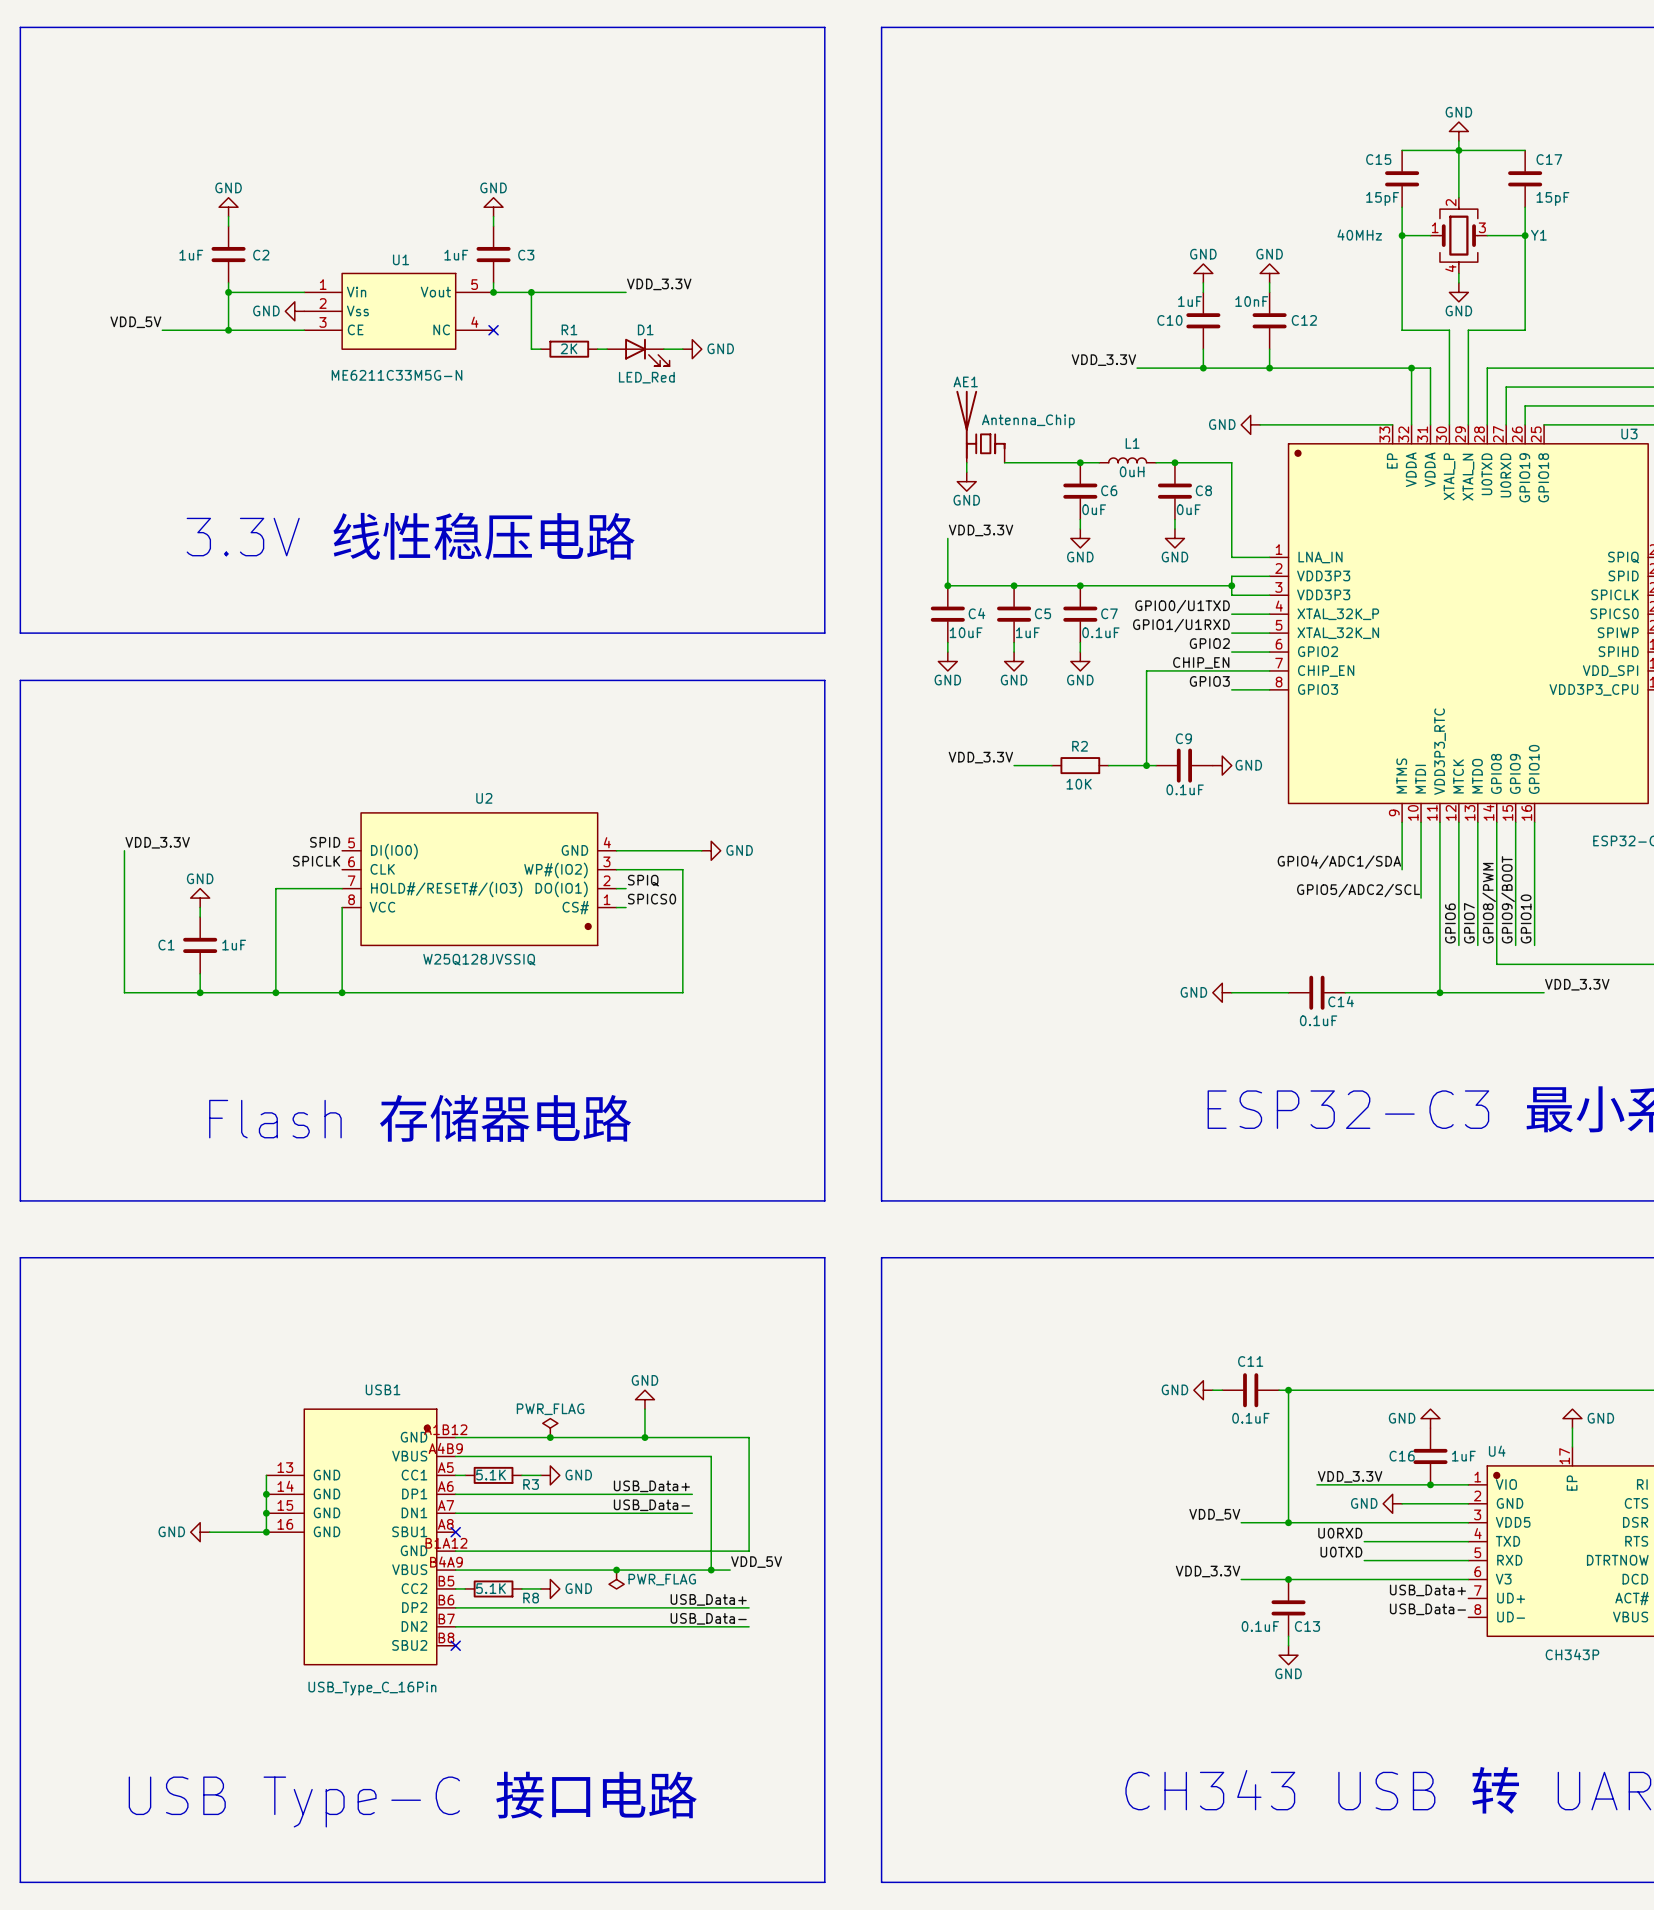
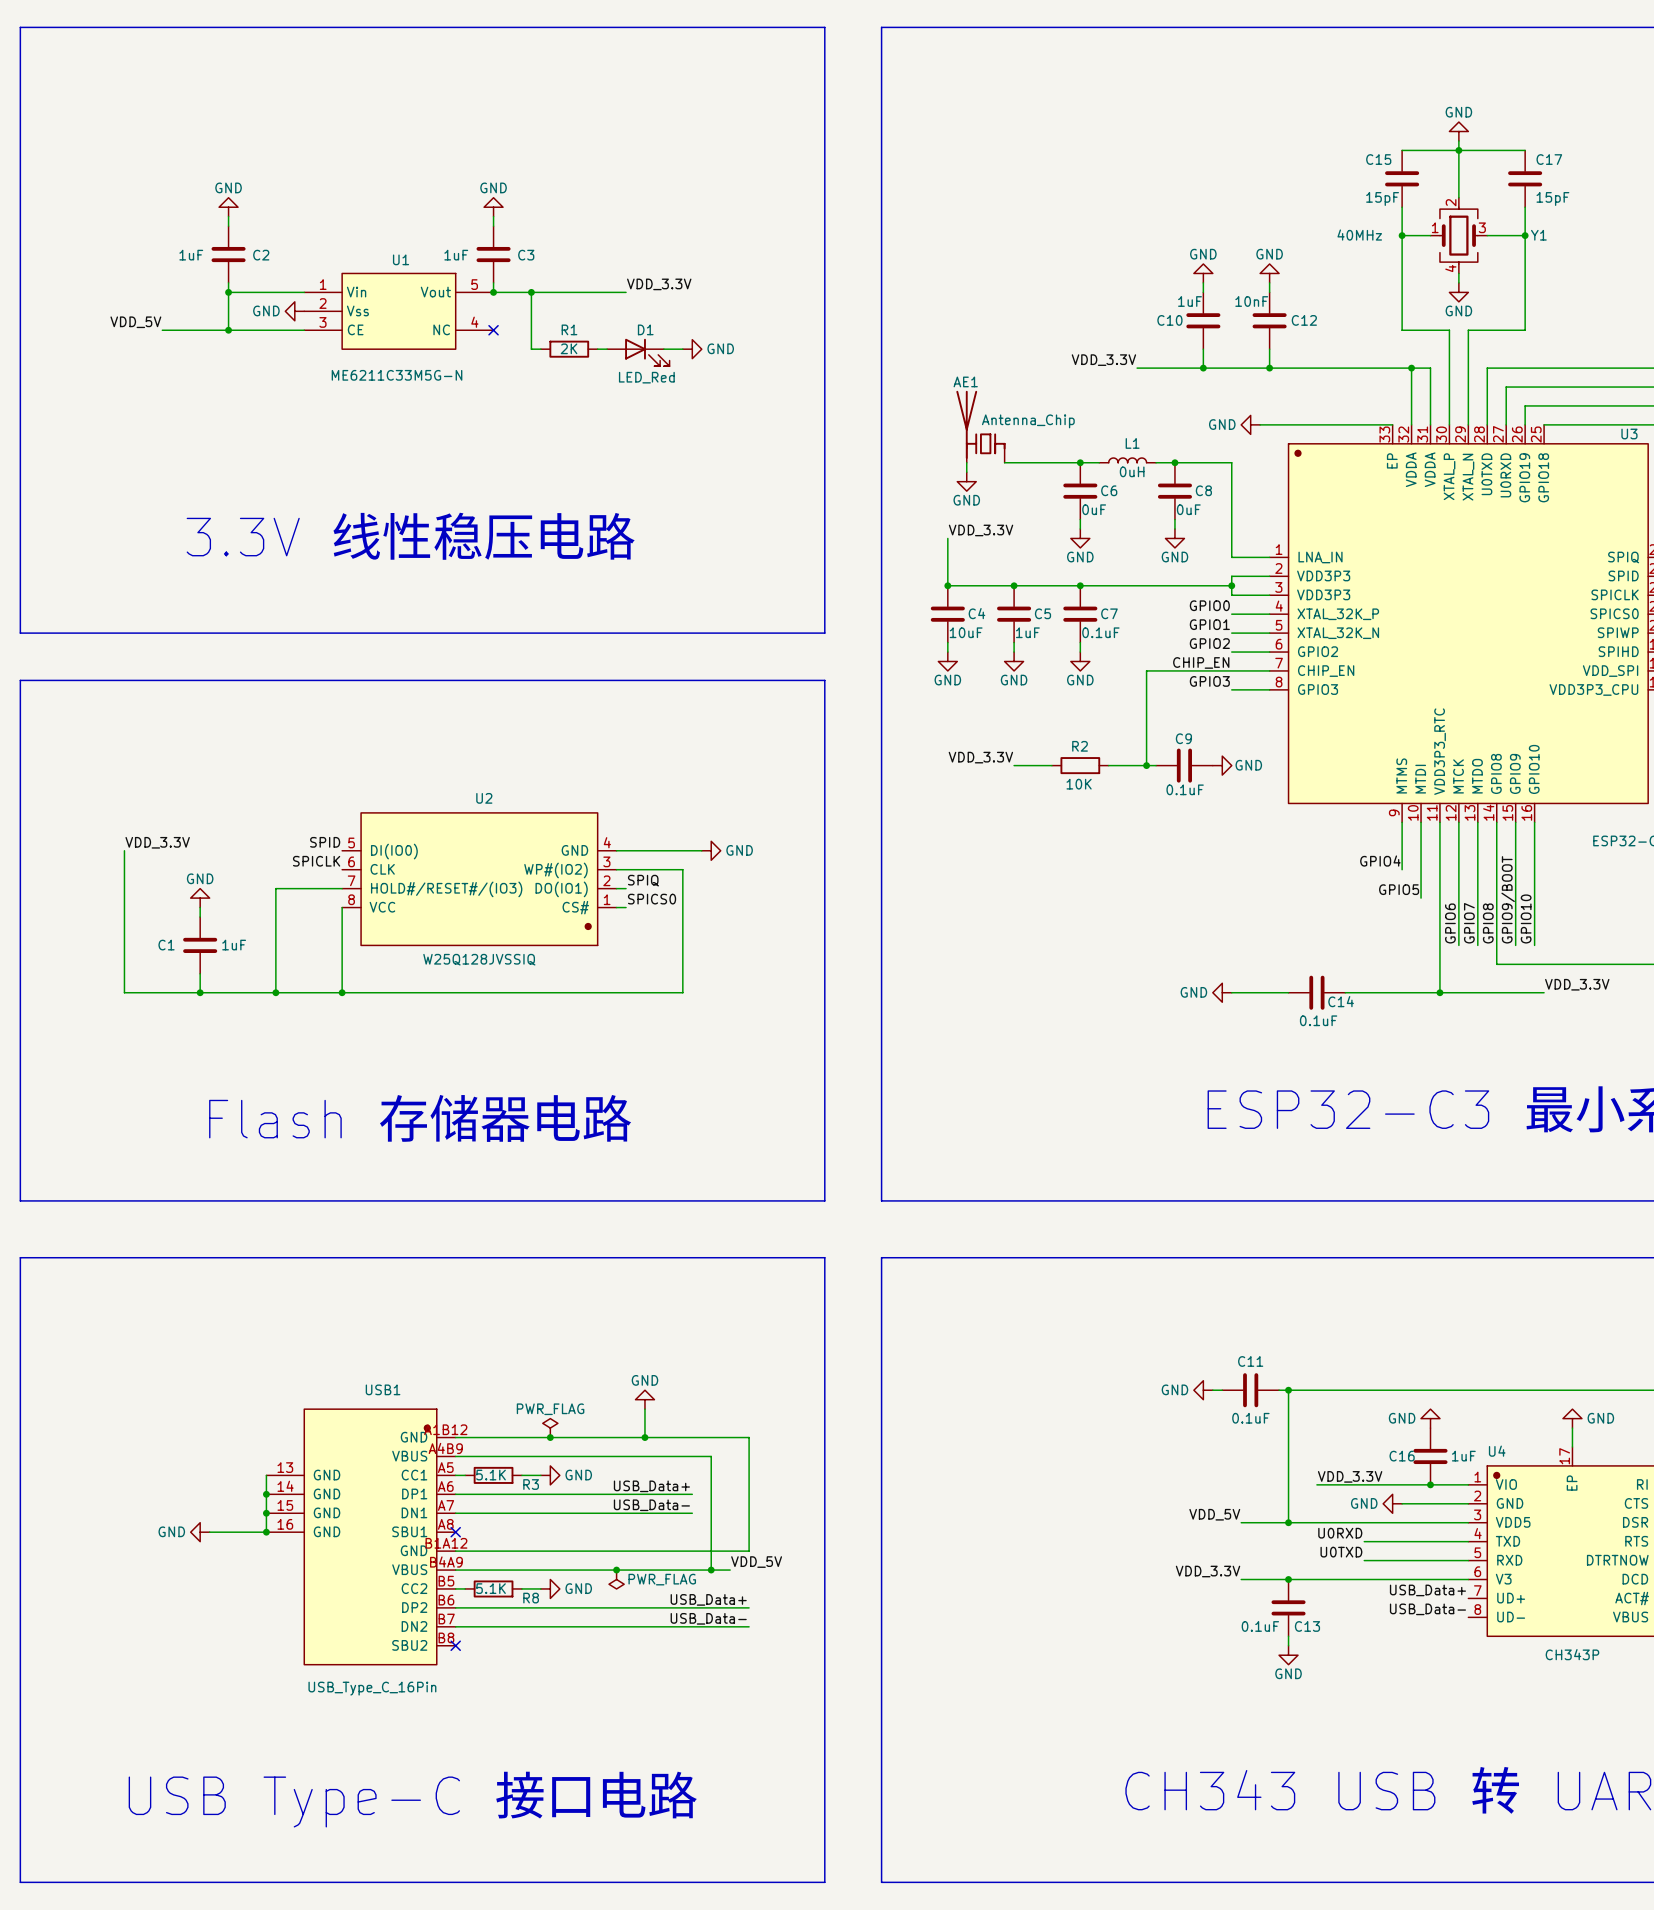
label: GPIO0/U1TXD (1182, 606) -> GPIO0 (1209, 605)
label: GPIO1/U1RXD (1181, 625) -> GPIO1 (1209, 624)
label: GPIO4/ADC1/SDA (1339, 862) -> GPIO4 (1380, 861)
label: GPIO5/ADC2/SCL (1358, 890) -> GPIO5 (1399, 889)
label: GPIO8/PWM (1489, 903) -> GPIO8 (1488, 923)

